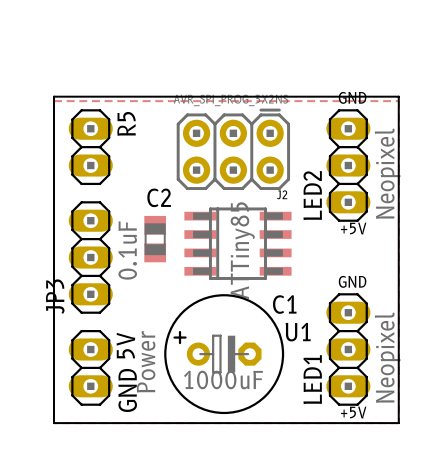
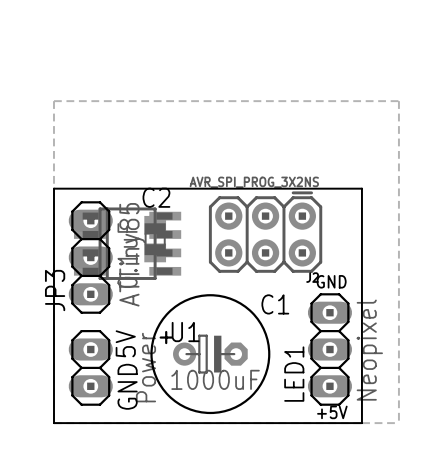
R5: (90, 147) -> none
J2 position: (233, 149) -> (265, 232)
LED2: Neopixel (348, 165) -> none
board edge: (53, 188) (53, 96) (398, 96) (398, 423) (361, 423) -> (53, 188) (361, 188) (361, 423)
U1 position: (237, 243) -> (127, 243)
LED1 position: (348, 349) -> (329, 349)
C1 position: (224, 354) -> (210, 354)

